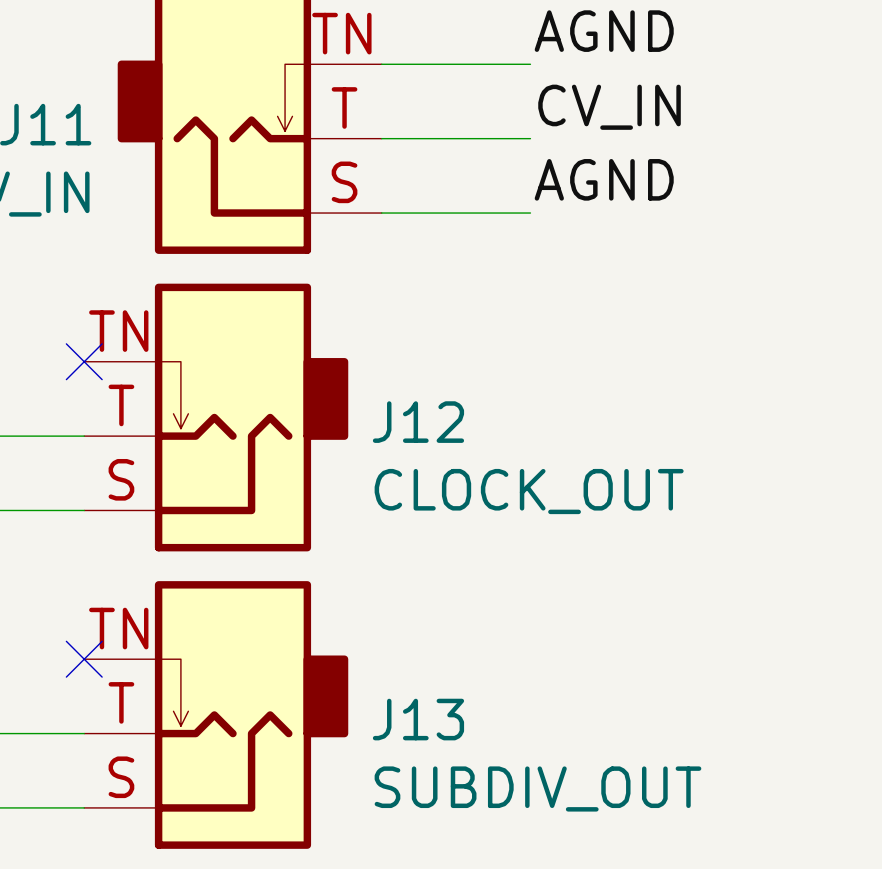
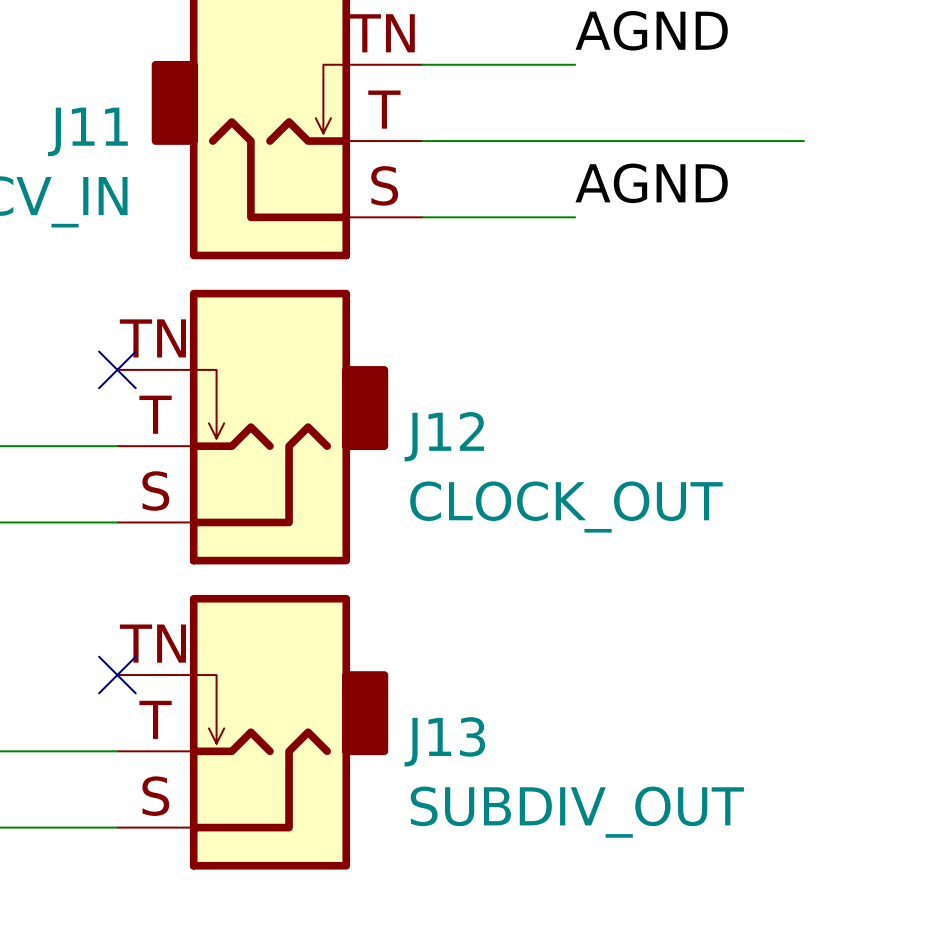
label: CV_IN (609, 107) -> none
wire: none -> (575, 141) (803, 141)

